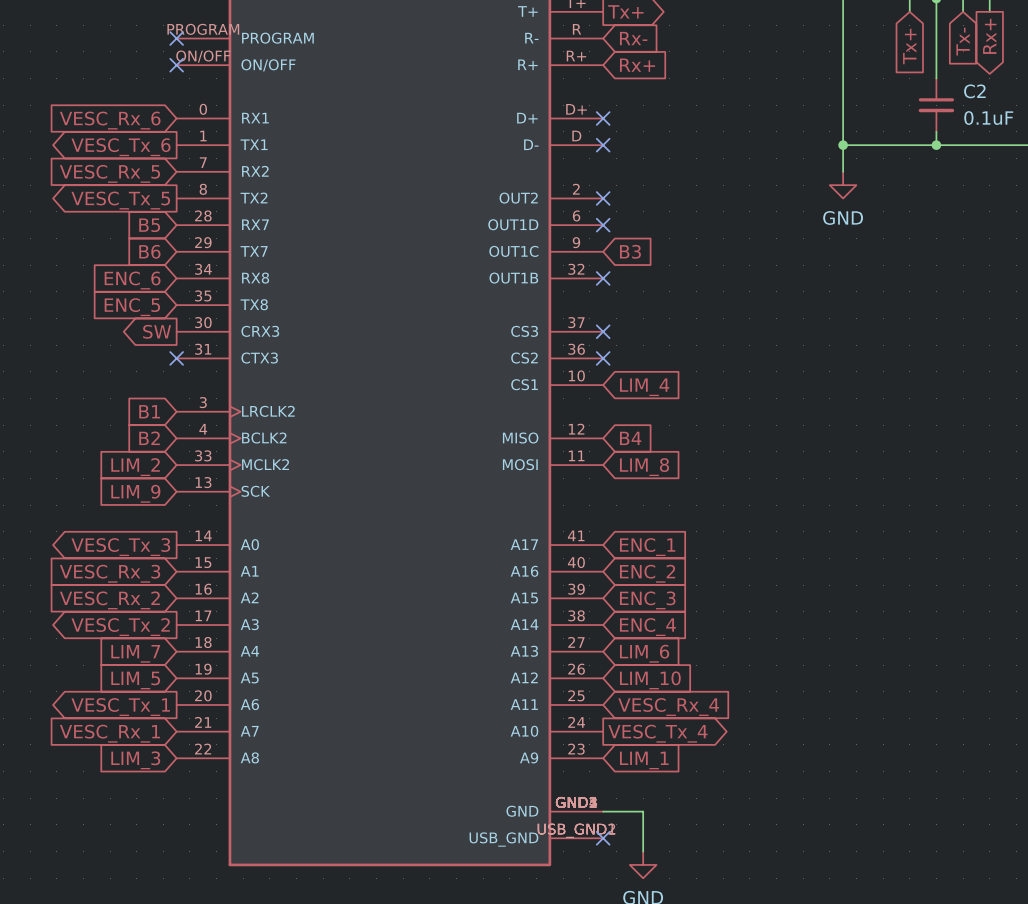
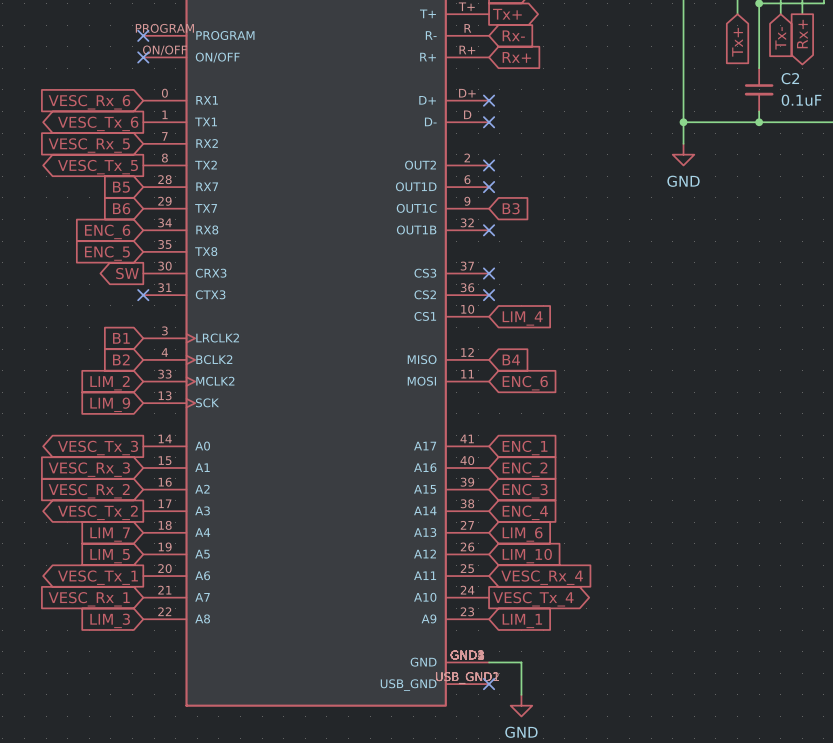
global label: LIM_8 (644, 467) -> ENC_6 (525, 383)

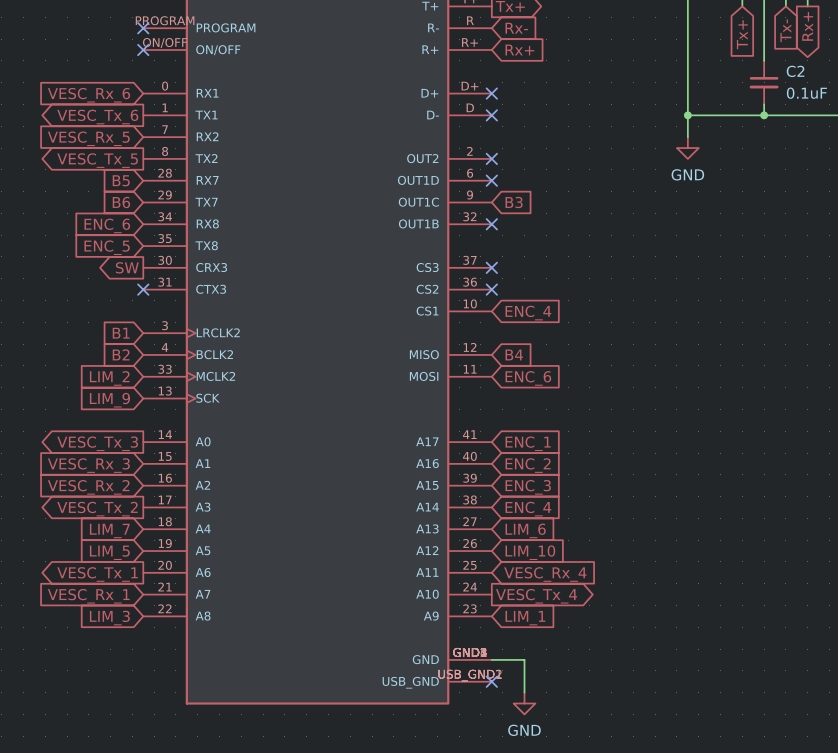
global label: LIM_4 (522, 318) -> ENC_4 (528, 313)

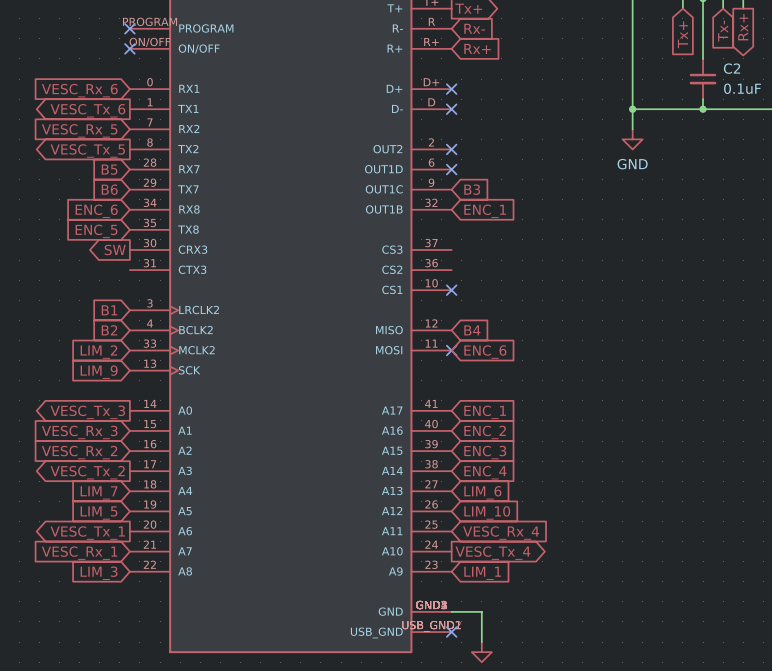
no-connect mark: (491, 224) -> none
global label: none -> ENC_1 (485, 211)
no-connect mark: (491, 267) -> none
no-connect mark: (143, 289) -> none
no-connect mark: (491, 289) -> none
no-connect mark: none -> (451, 290)
global label: ENC_4 (528, 313) -> none
no-connect mark: none -> (451, 350)

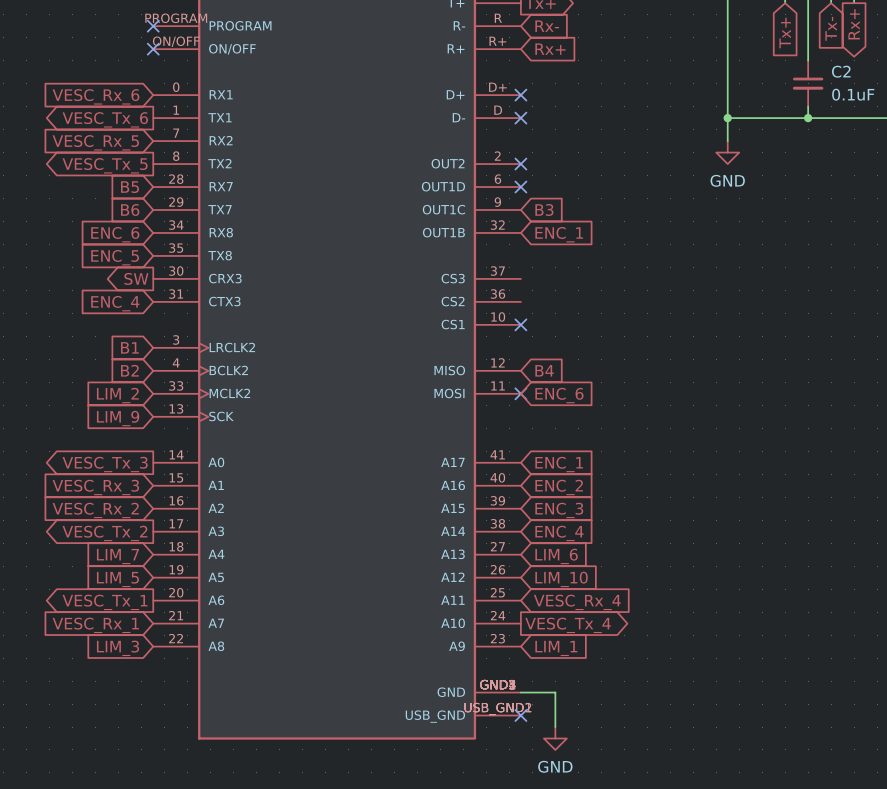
global label: none -> ENC_4 (115, 303)

